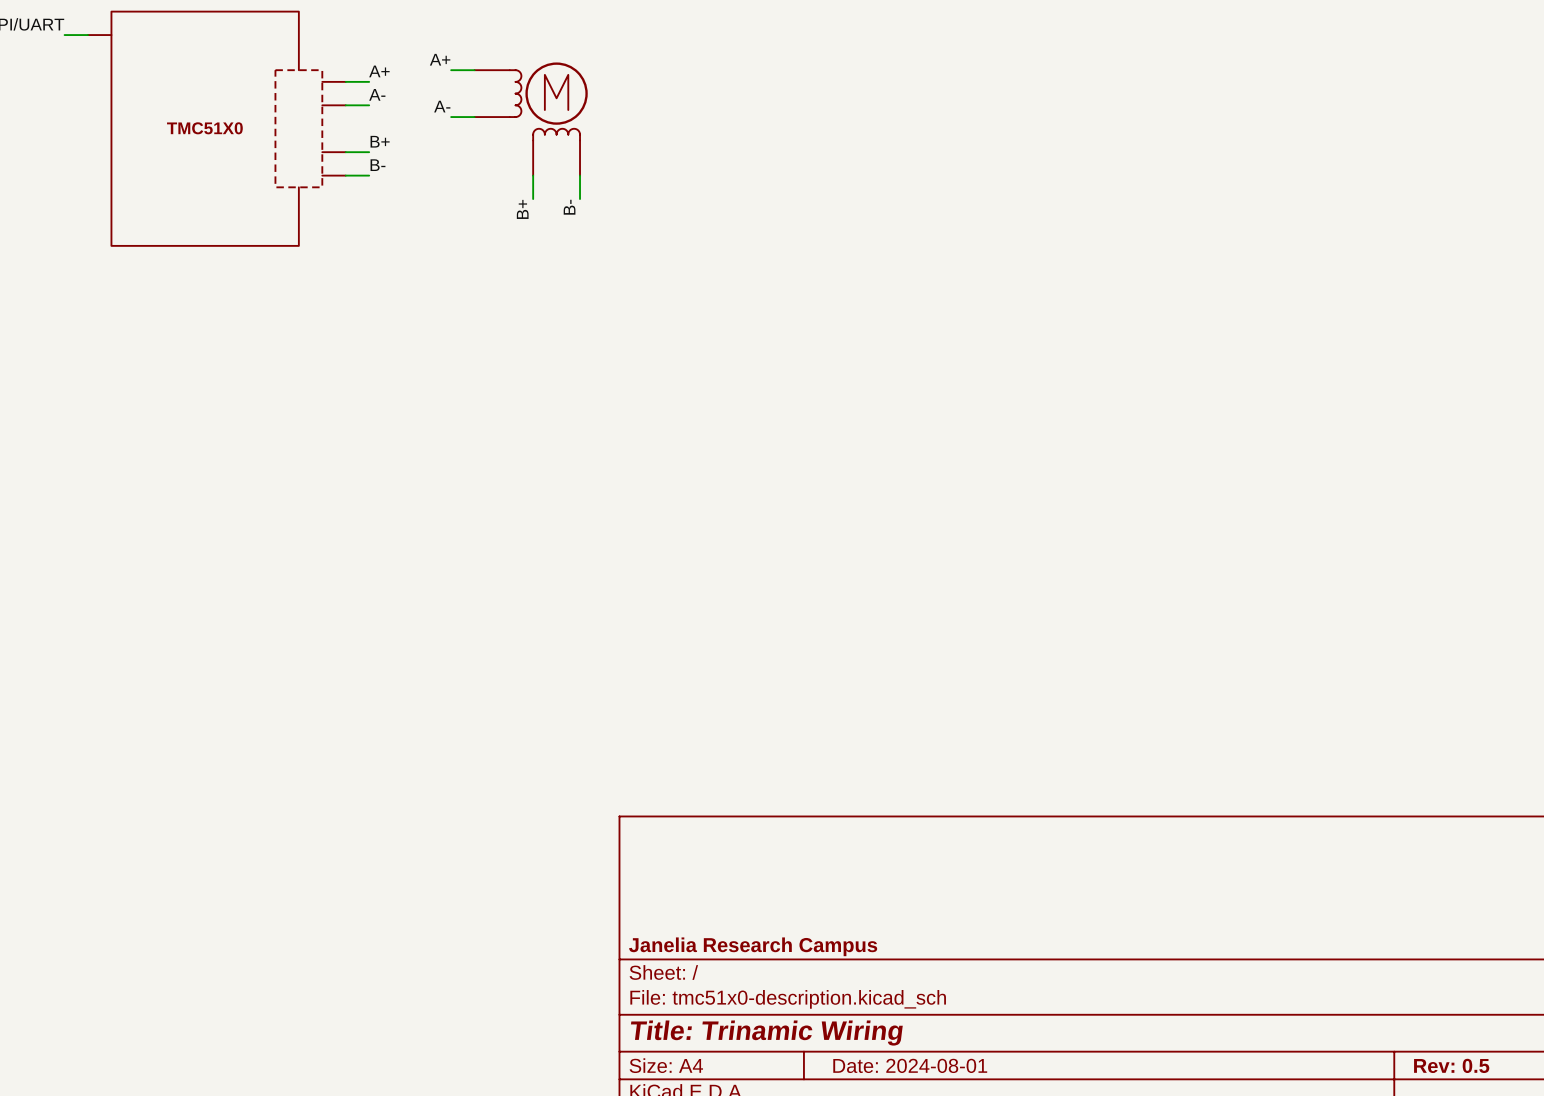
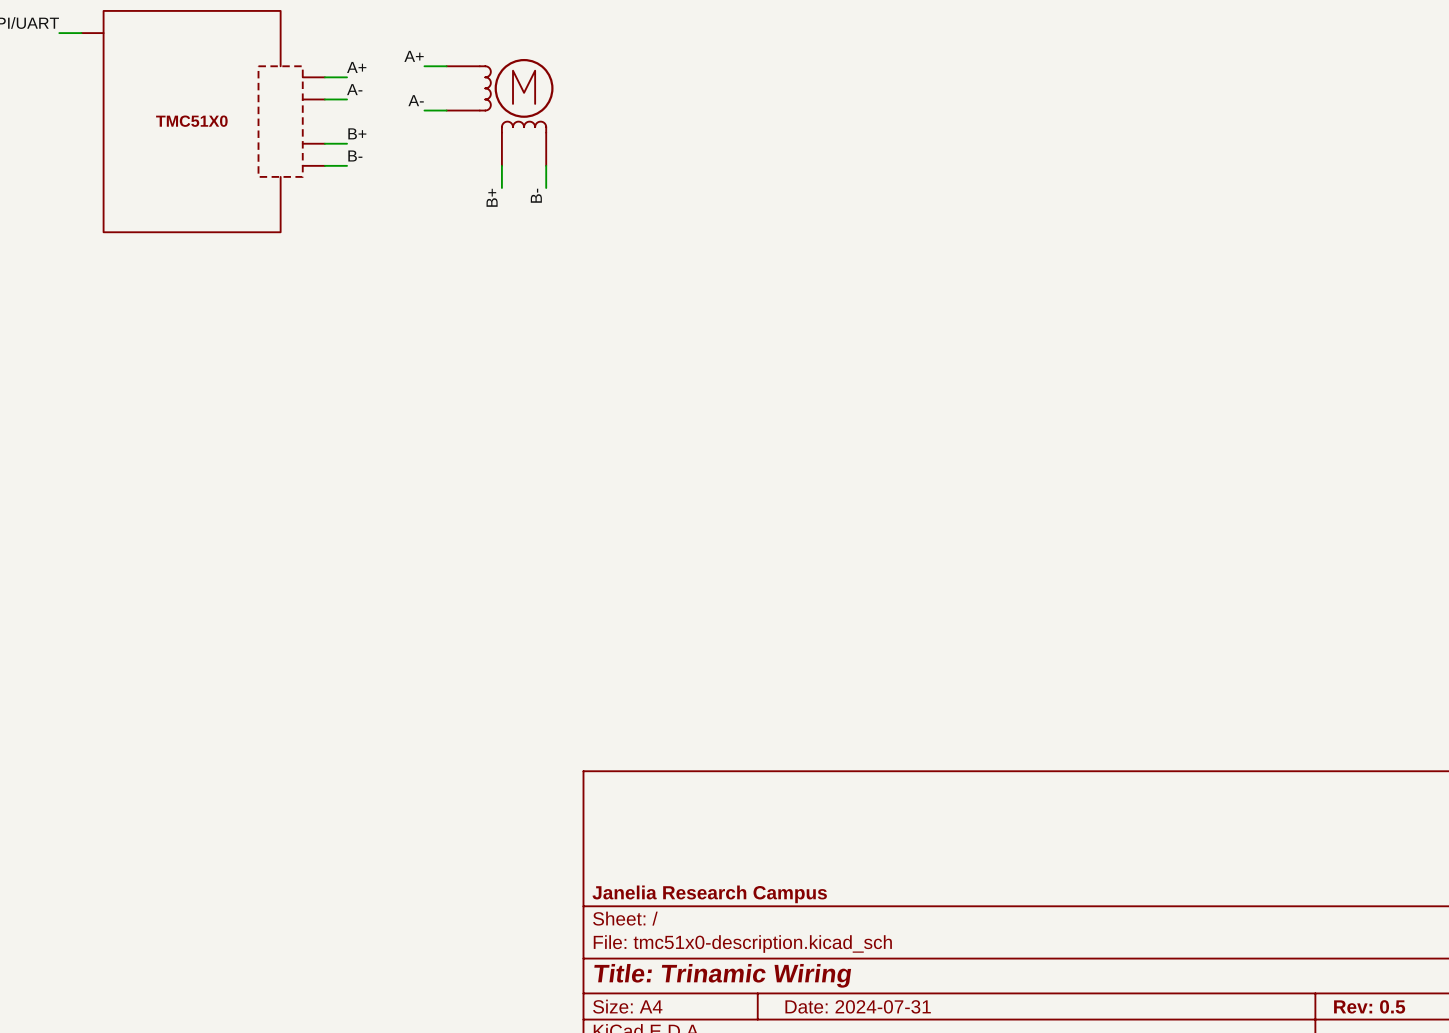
title block: Date: 2024-08-01 (910, 1065) -> Date: 2024-07-31 (858, 1006)

